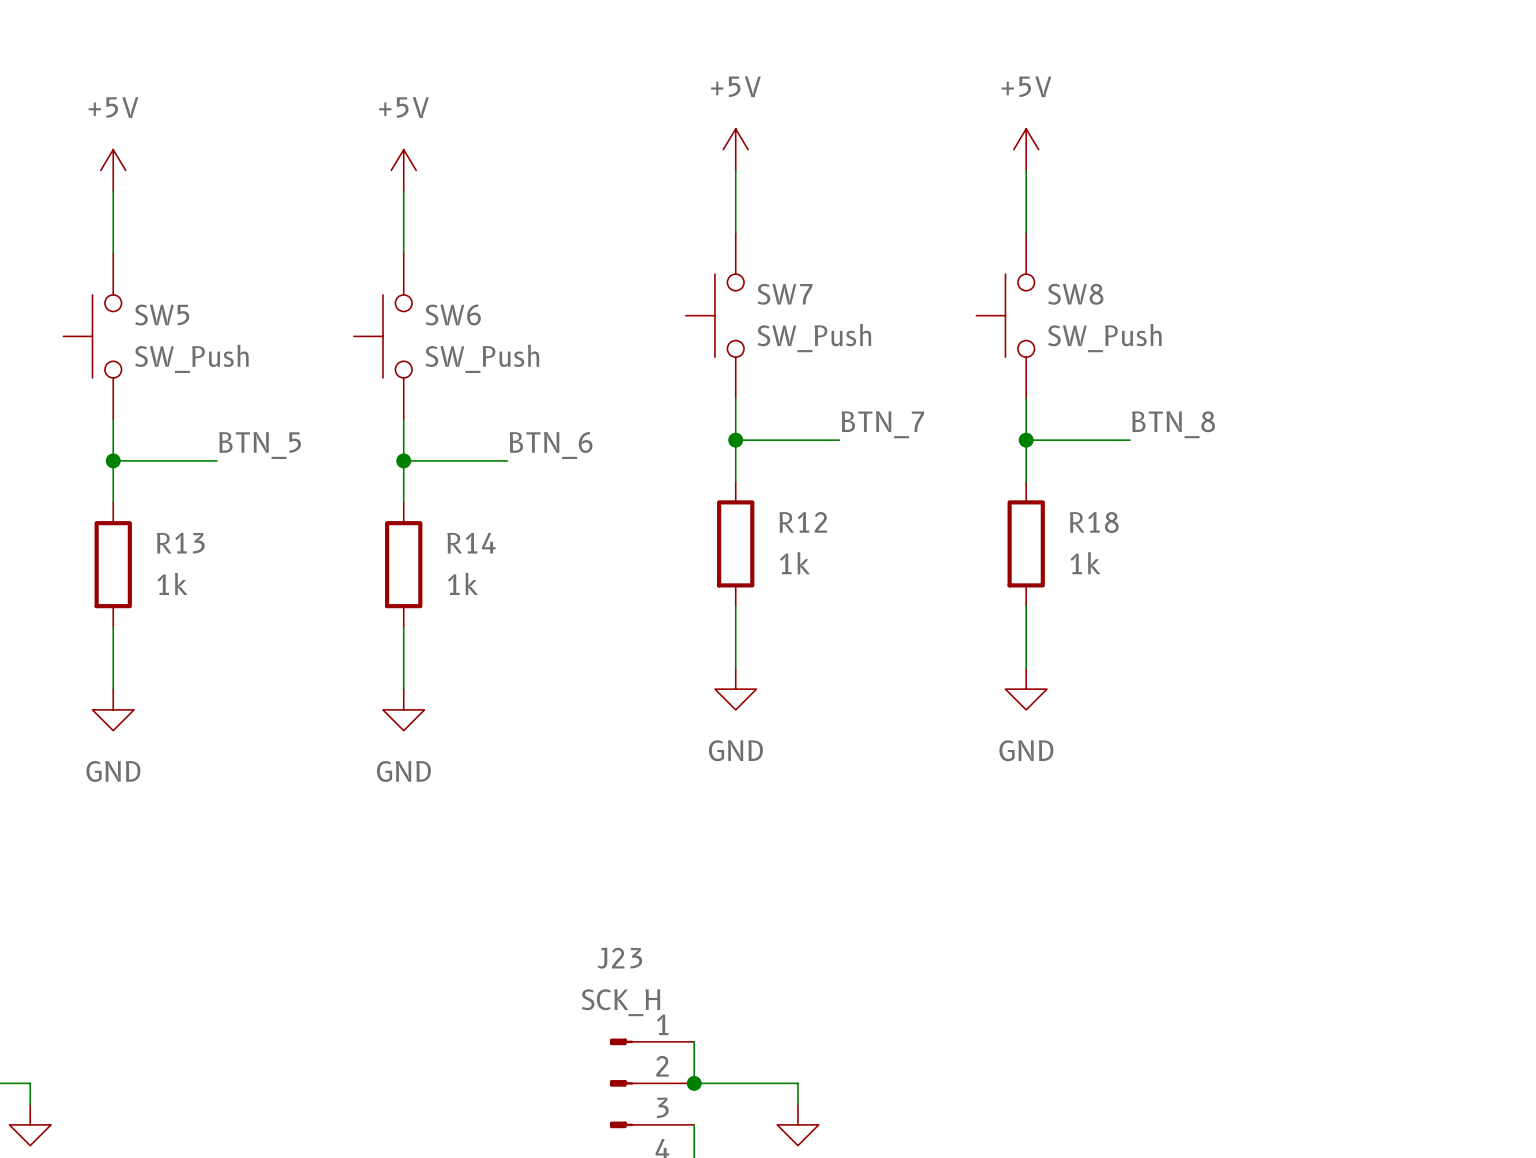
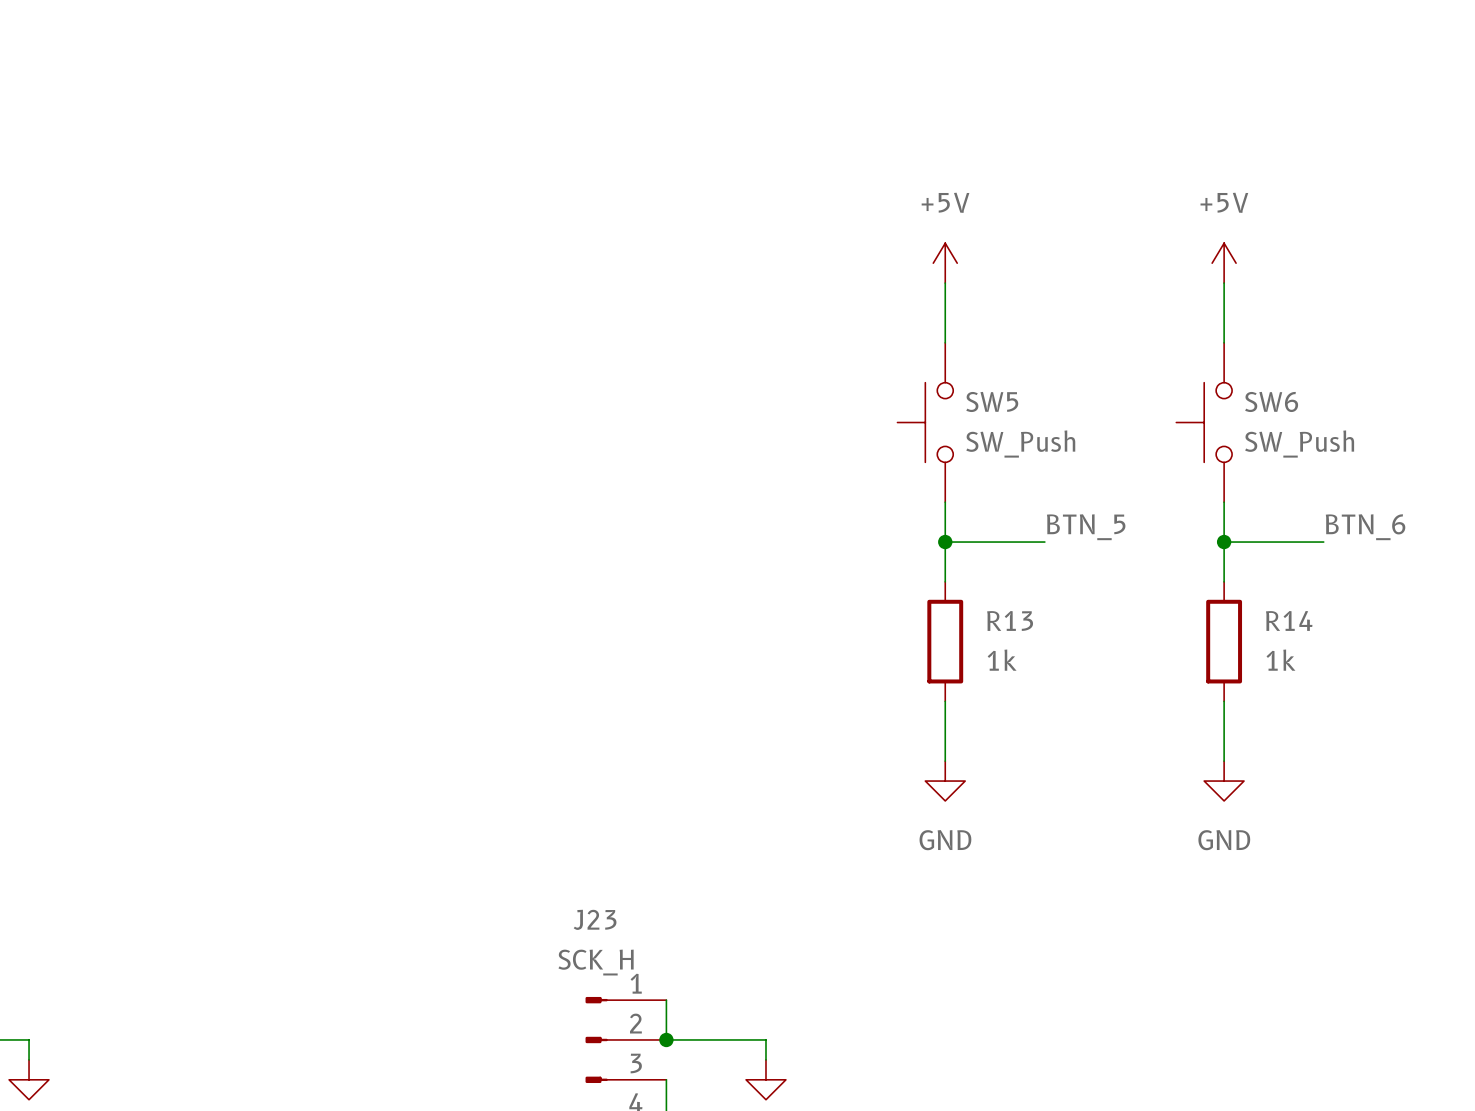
power symbol: +5V (735, 149) -> none
power symbol position: +5V (1026, 149) -> +5V (945, 263)
power symbol: +5V (113, 170) -> none
power symbol: +5V (403, 170) -> none
wire: (735, 170) (735, 232) -> (945, 283) (945, 342)
wire: (1026, 170) (1026, 232) -> (1224, 283) (1224, 342)
wire: (113, 191) (113, 253) -> none
wire: (403, 191) (403, 253) -> none
power symbol: none -> +5V (1224, 263)
SW7: SW_Push (714, 315) -> none
SW8: SW_Push (1005, 315) -> none
SW5 position: (92, 336) -> (925, 422)
SW6 position: (382, 336) -> (1204, 422)
wire: (735, 398) (735, 481) -> (945, 502) (945, 581)
wire: (1026, 398) (1026, 481) -> (1224, 502) (1224, 581)
wire: (113, 419) (113, 502) -> none
wire: (403, 419) (403, 502) -> none
label: BTN_7 (882, 424) -> none
label: BTN_8 (1173, 424) -> none
wire: (735, 440) (839, 440) -> (945, 542) (1044, 542)
junction: (735, 440) -> none
wire: (1026, 440) (1129, 440) -> (1224, 542) (1323, 542)
junction: (1026, 440) -> none
label: BTN_5 (260, 445) -> none
label: BTN_6 (551, 445) -> none
wire: (113, 460) (216, 460) -> none
junction: (113, 460) -> none
wire: (403, 460) (507, 460) -> none
junction: (403, 460) -> none
R12: 1k (735, 543) -> none
R18: 1k (1026, 543) -> none
label: none -> BTN_5 (1086, 527)
label: none -> BTN_6 (1365, 527)
R13 position: (113, 564) -> (945, 641)
R14 position: (403, 564) -> (1224, 641)
junction: none -> (945, 542)
junction: none -> (1224, 542)
wire: (735, 606) (735, 668) -> (945, 701) (945, 761)
wire: (1026, 606) (1026, 668) -> (1224, 701) (1224, 761)
wire: (113, 626) (113, 689) -> none
wire: (403, 626) (403, 689) -> none
power symbol: GND (735, 689) -> none
power symbol position: GND (1026, 689) -> GND (945, 781)
power symbol: GND (113, 709) -> none
power symbol: GND (403, 709) -> none
power symbol: none -> GND (1224, 781)

